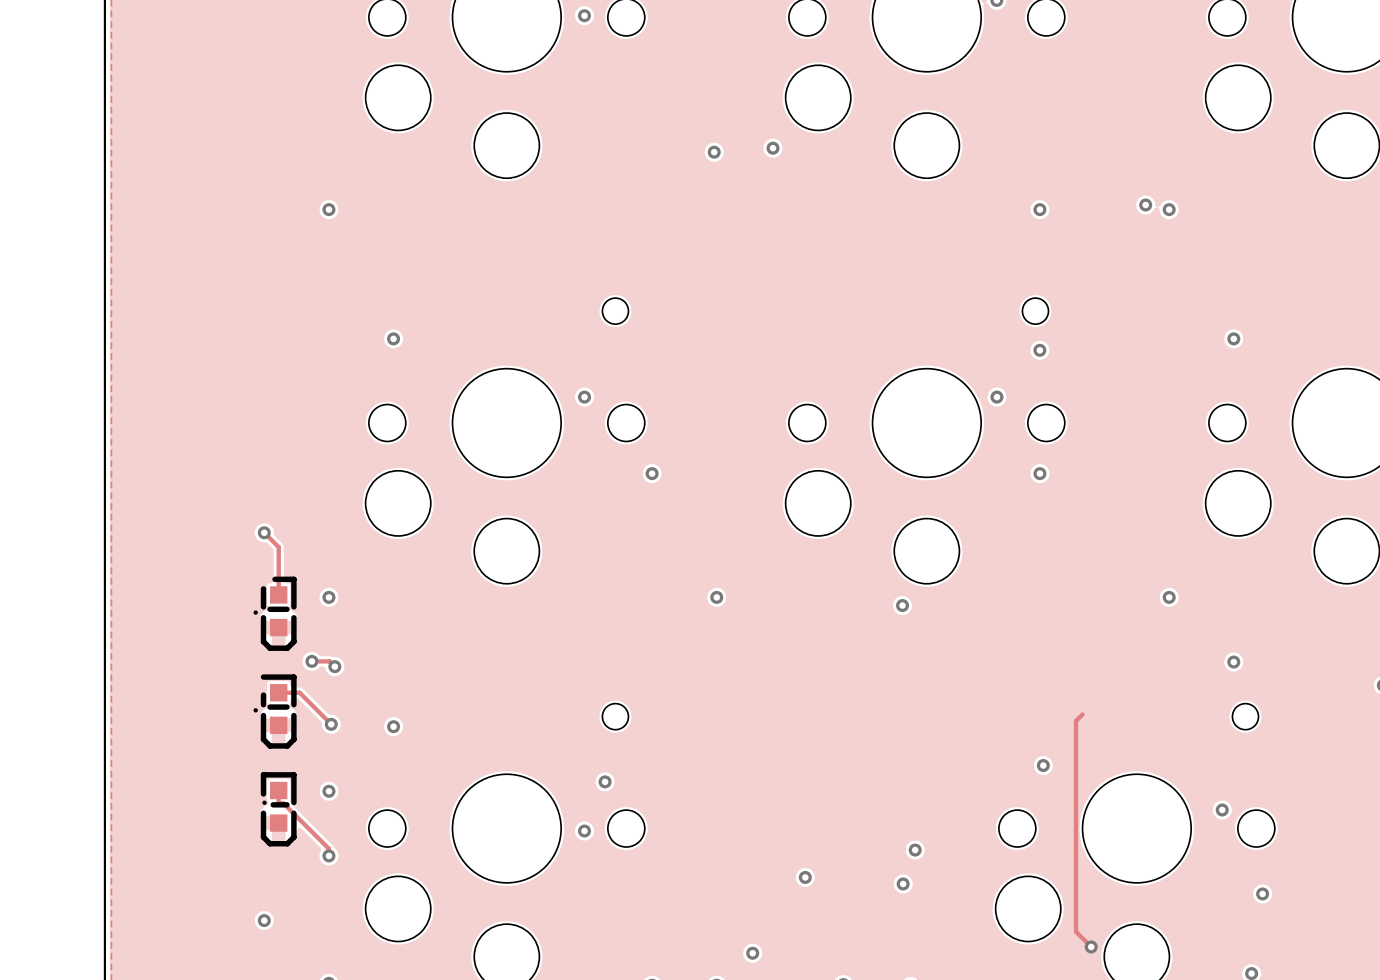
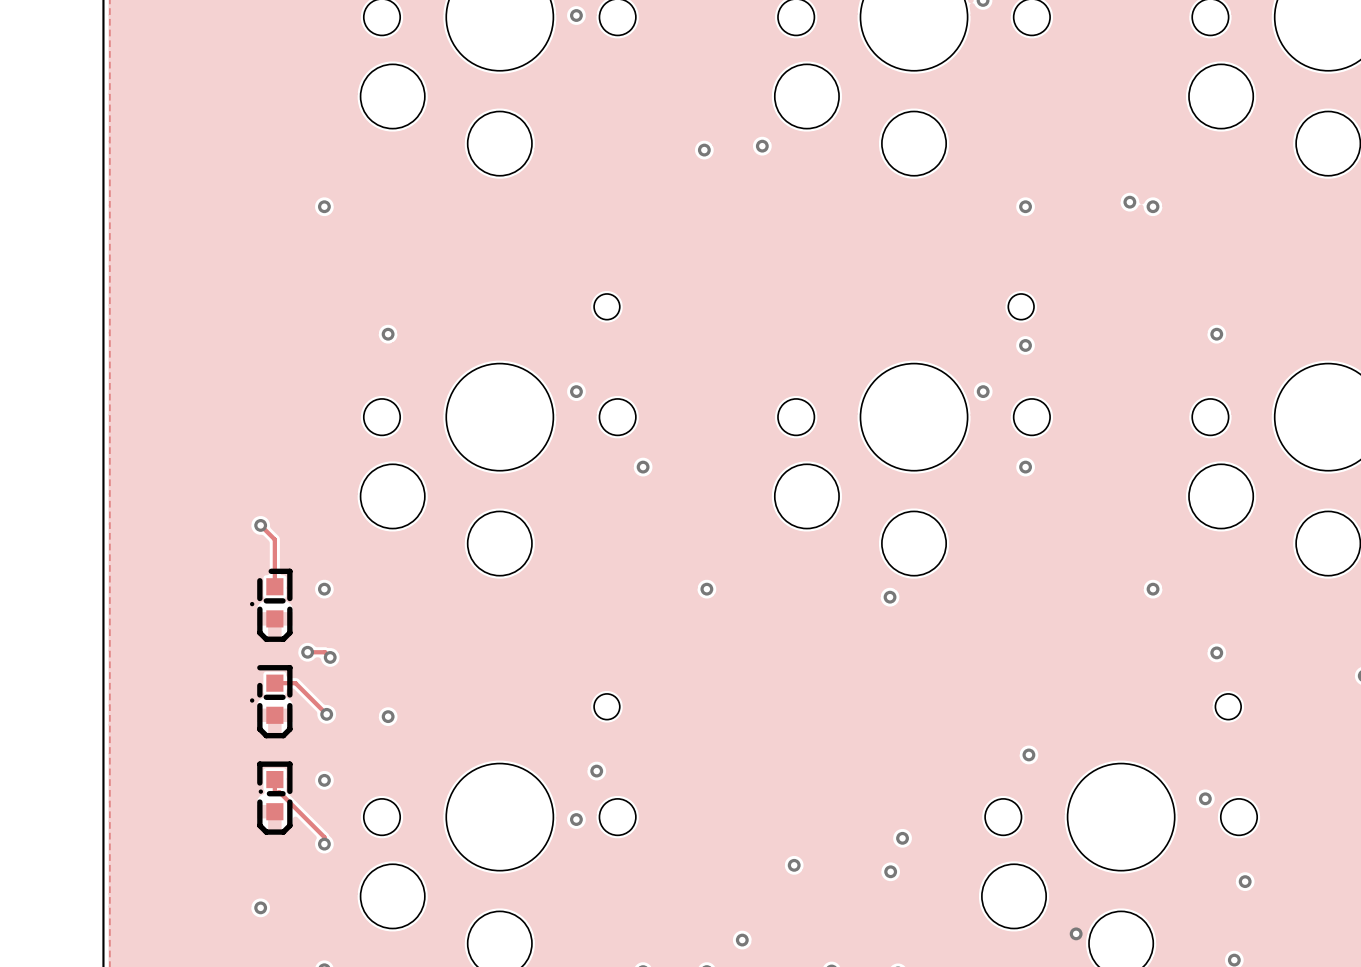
track: (1082, 714) (1076, 720) (1076, 931) (1091, 946) -> none

